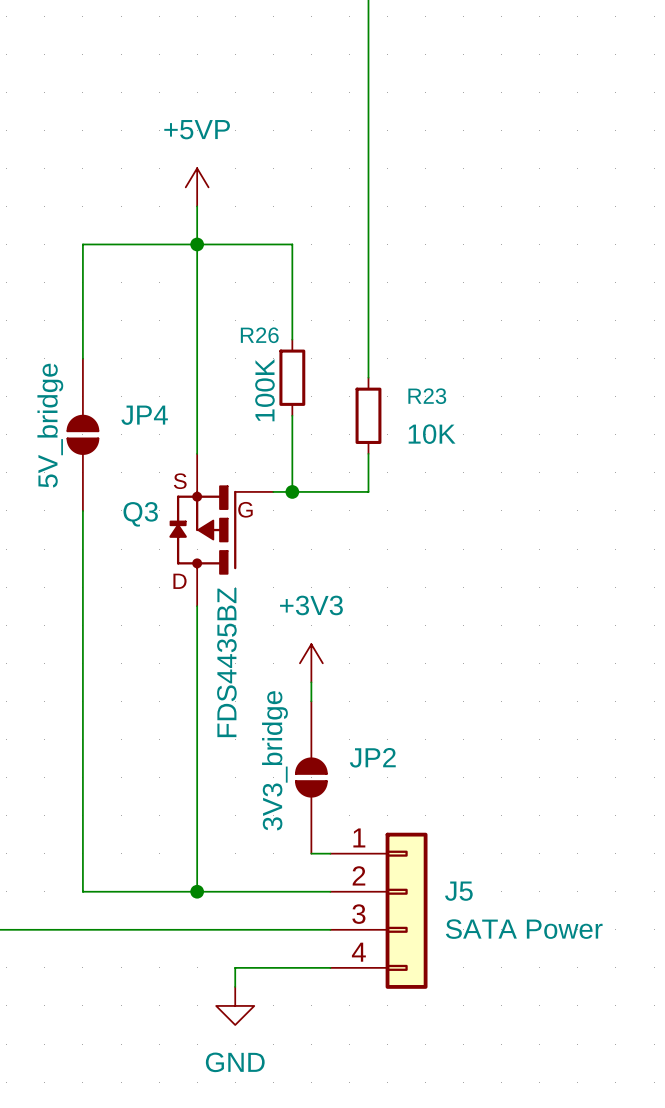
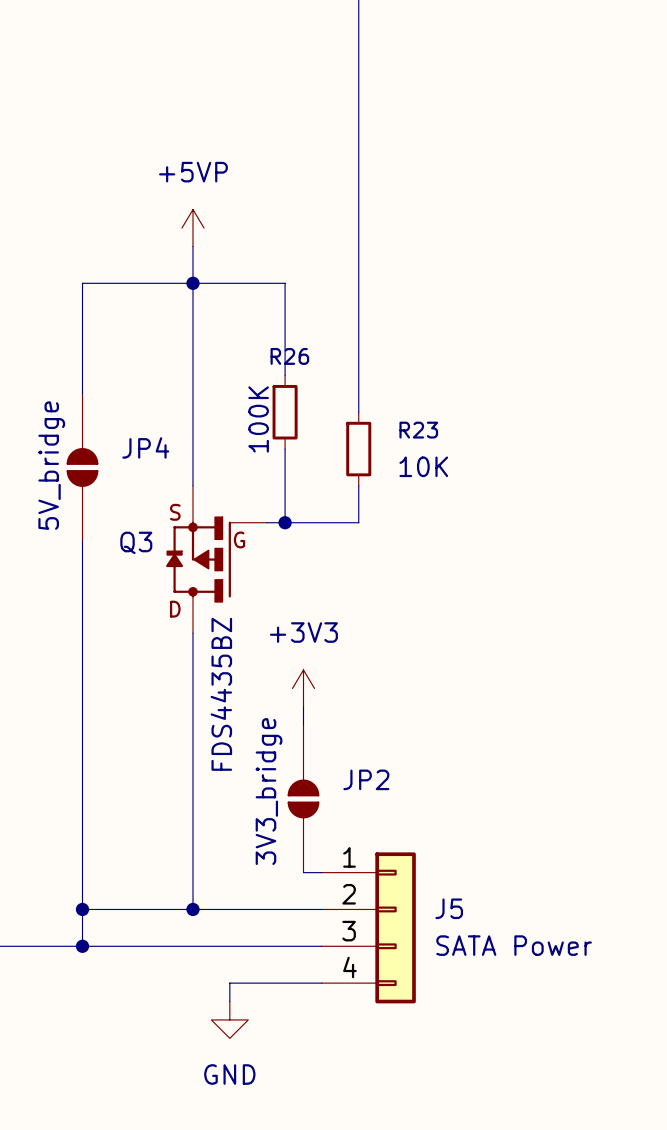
R26 name position: R26 (259, 335) -> R26 (289, 356)
wire: none -> (82, 909) (82, 946)
junction: none -> (82, 909)
junction: none -> (82, 946)

